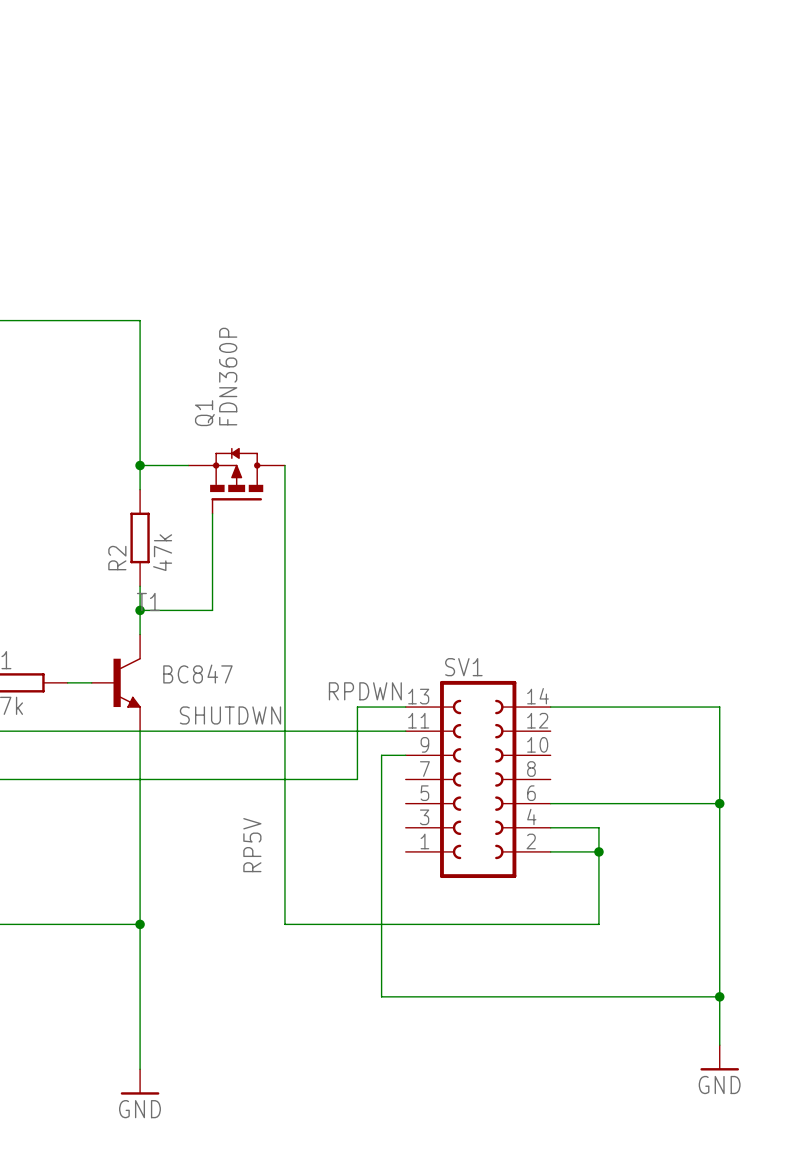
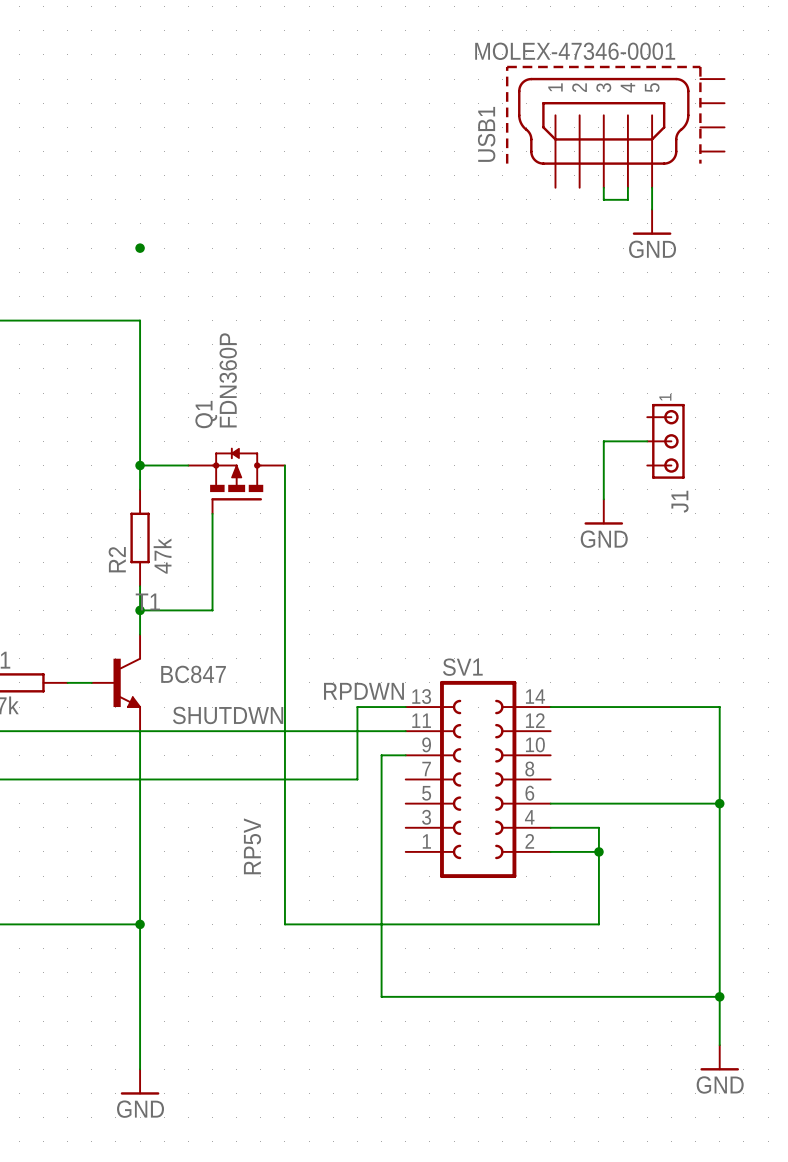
USB1: none -> MOLEX-47346-0001 (615, 126)
wire: none -> (603, 187) (603, 199) (627, 199) (627, 187)
wire: none -> (652, 187) (652, 209)
power symbol: none -> GND (652, 222)
junction: none -> (140, 248)
wire: none -> (647, 441) (603, 441) (603, 499)
J1: none -> (665, 441)
power symbol: none -> GND (603, 511)

